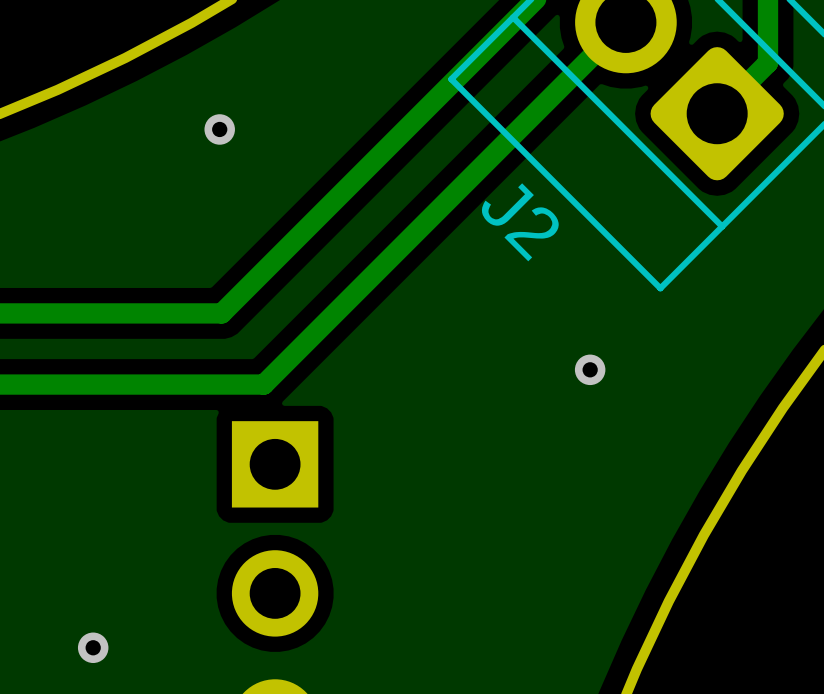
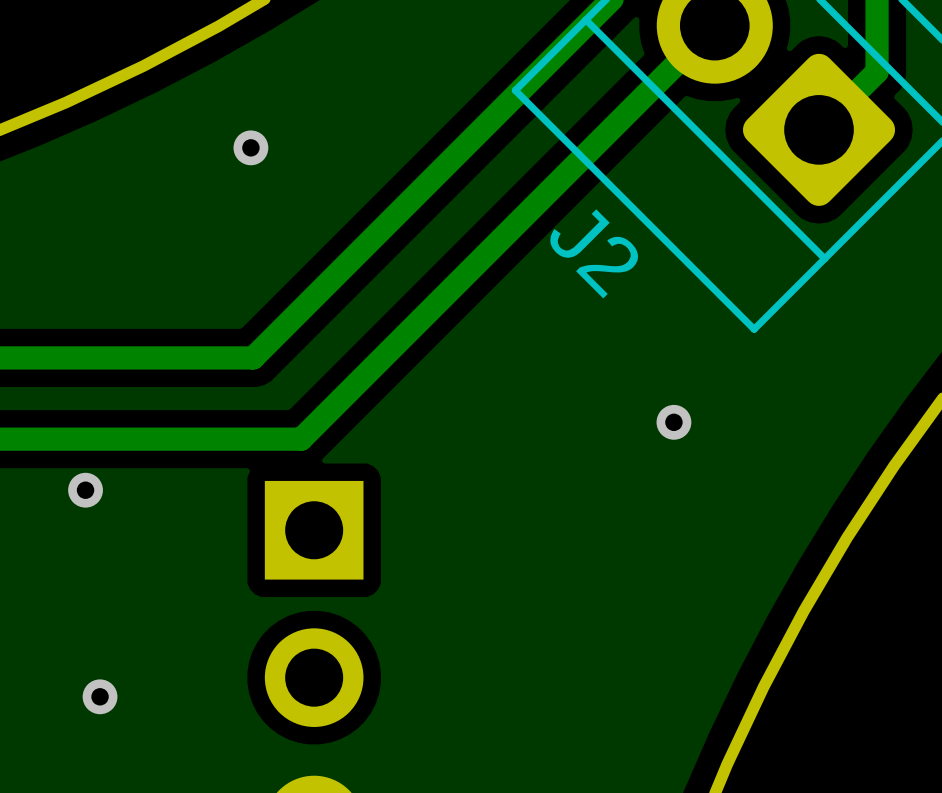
via: none -> (85, 490)
via position: (93, 647) -> (100, 696)

